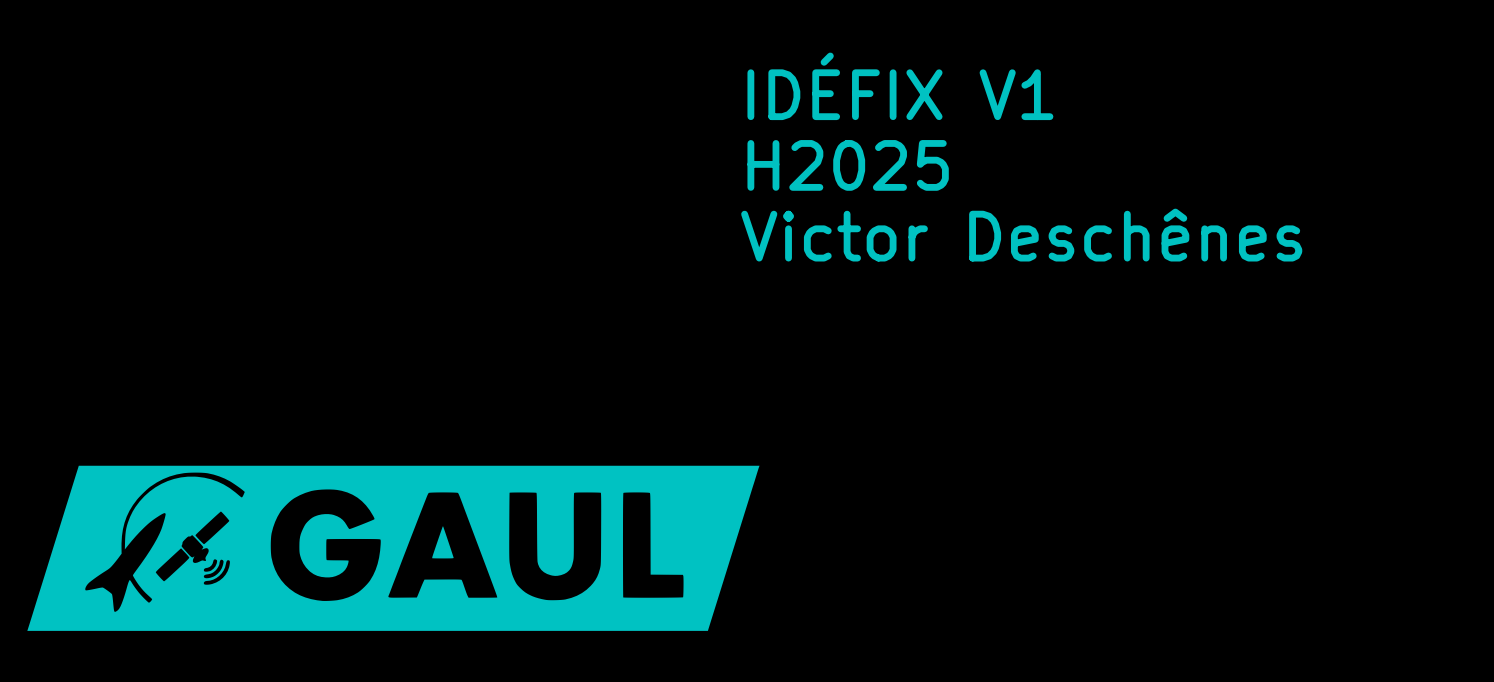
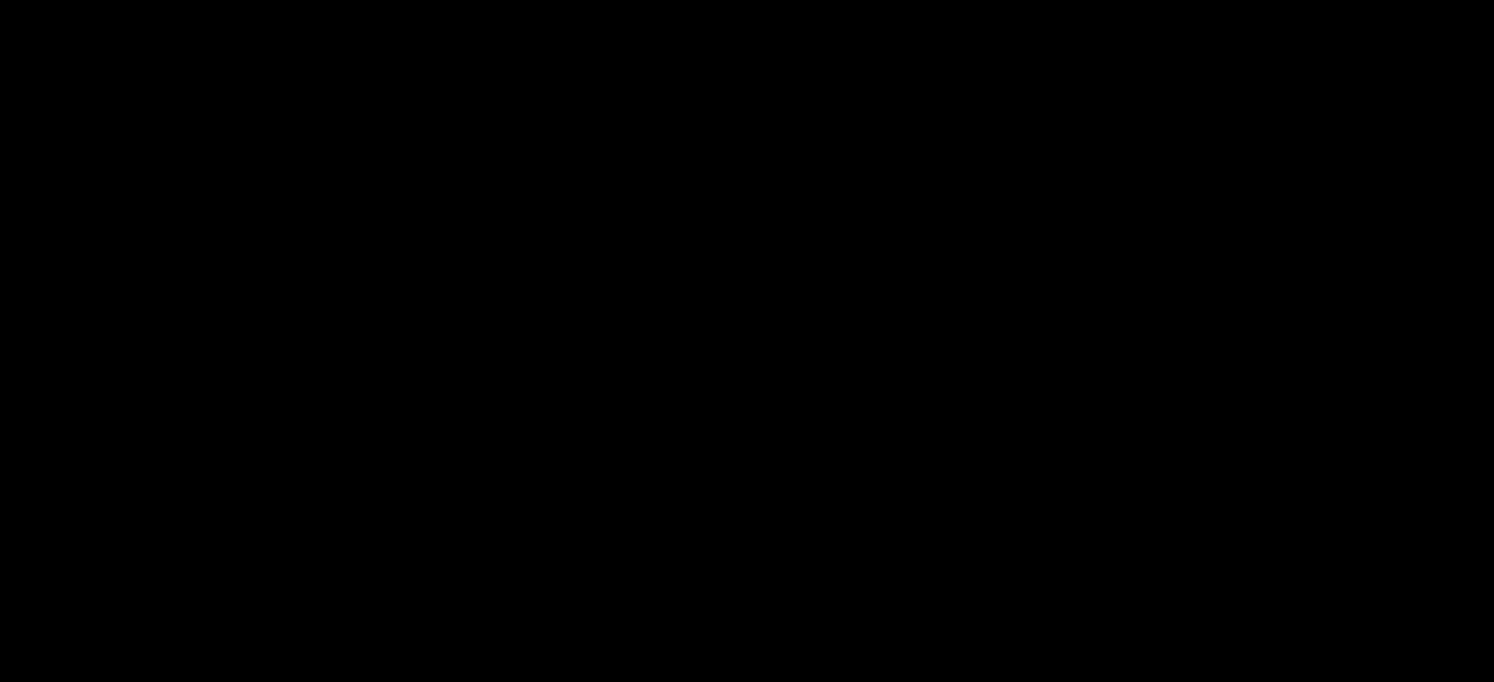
text: IDÉFIX V1 (900, 86) -> none
text: H2025 (848, 165) -> none
text: Victor Deschênes (1021, 235) -> none
drawing: [27, 465, 760, 631] -> none

